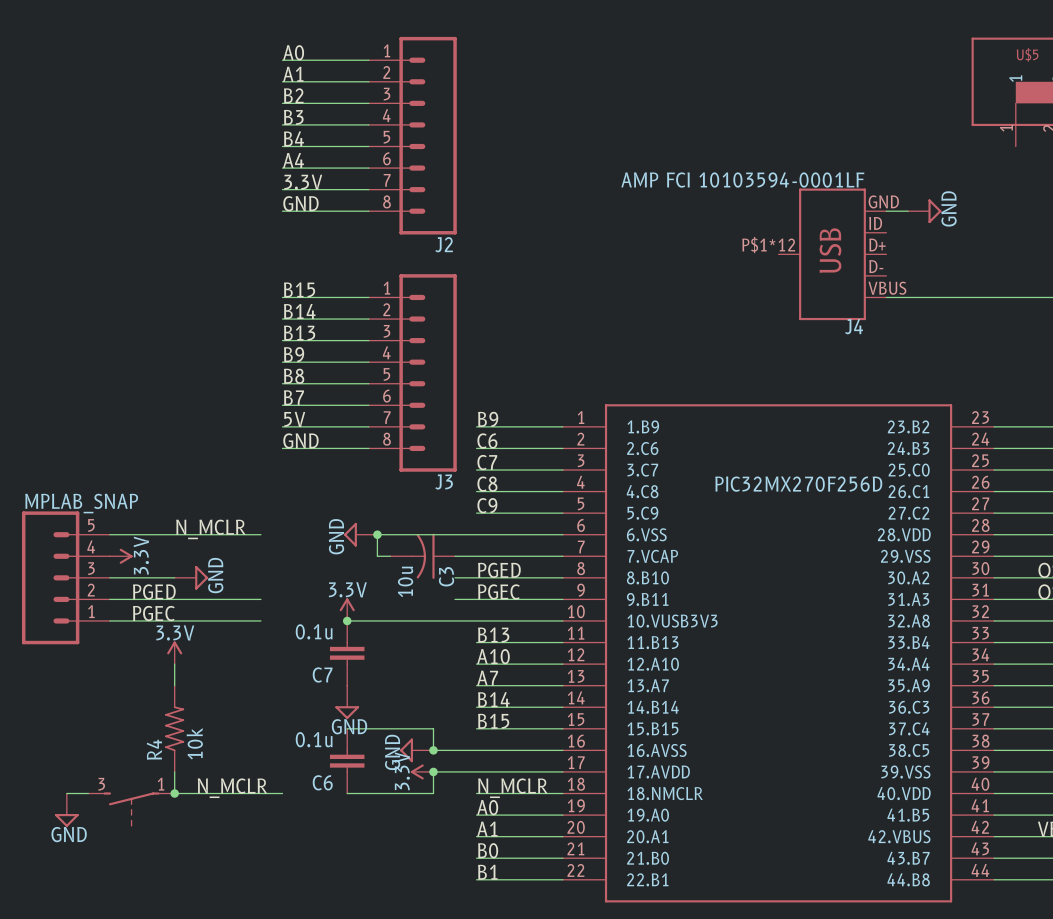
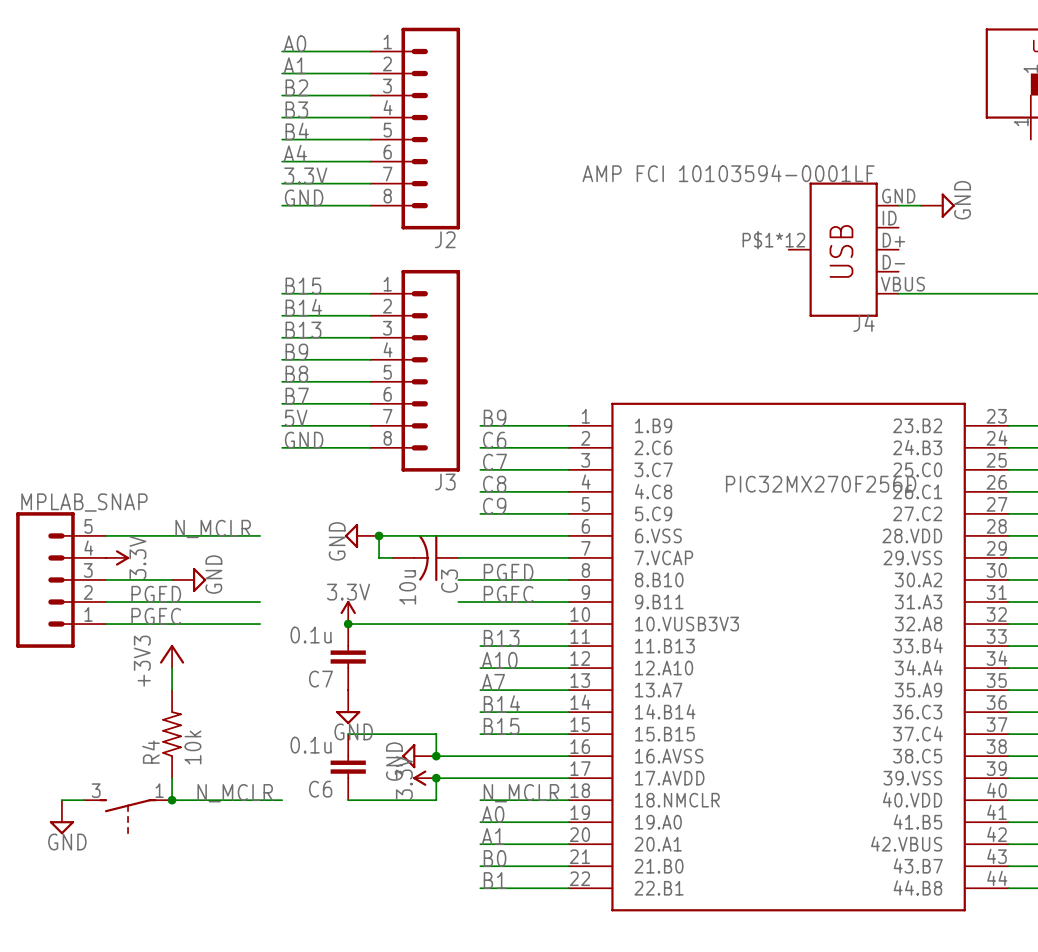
power symbol: 3.3V (174, 652) -> +3V3 (172, 656)

